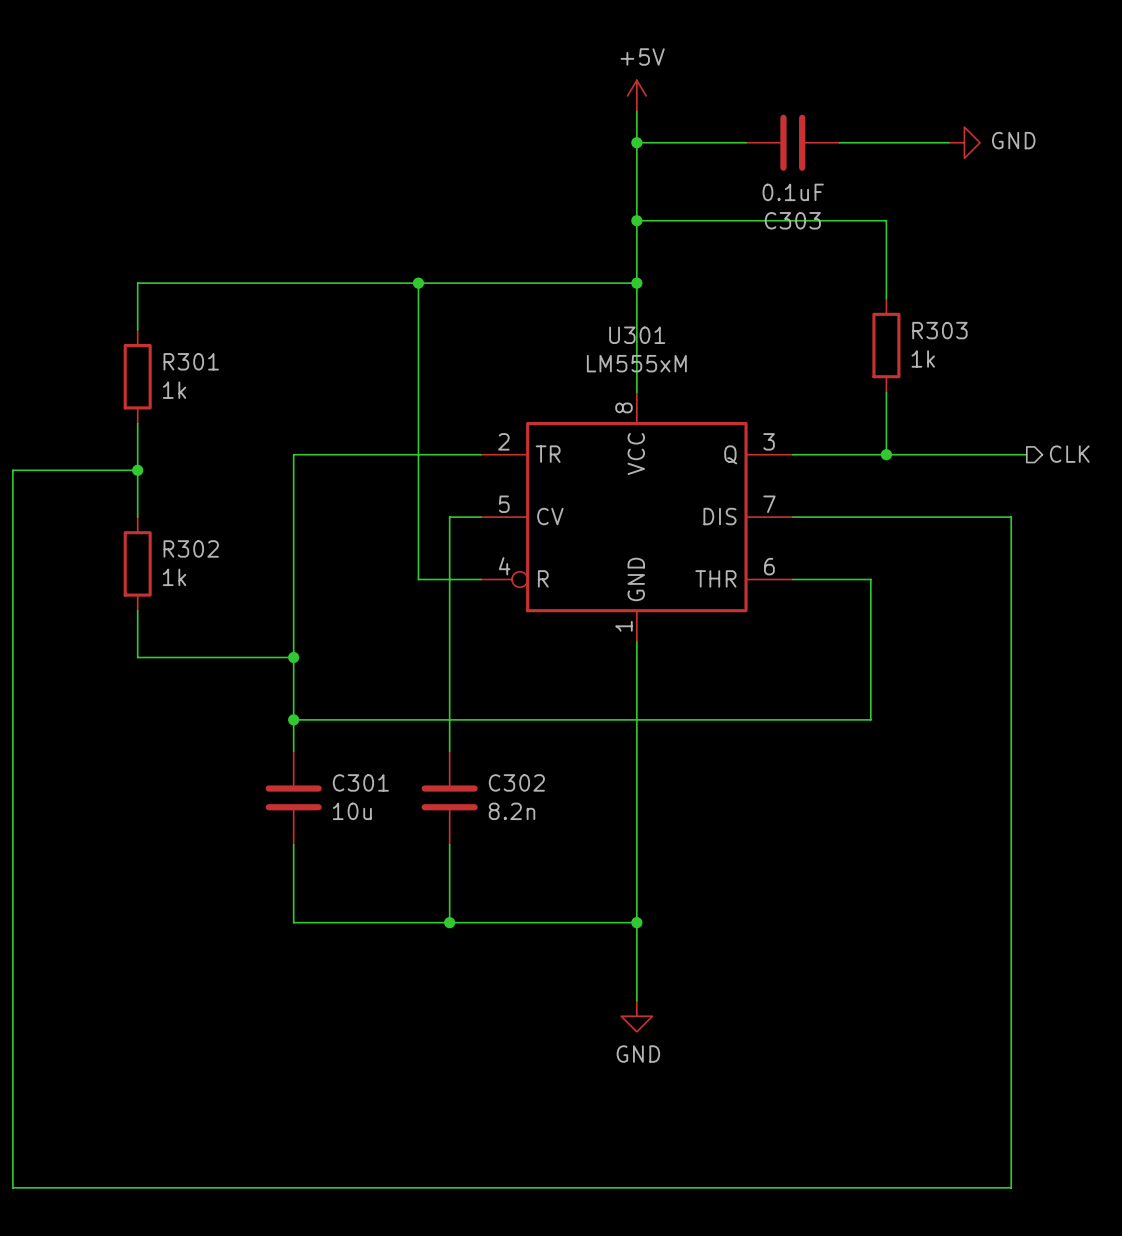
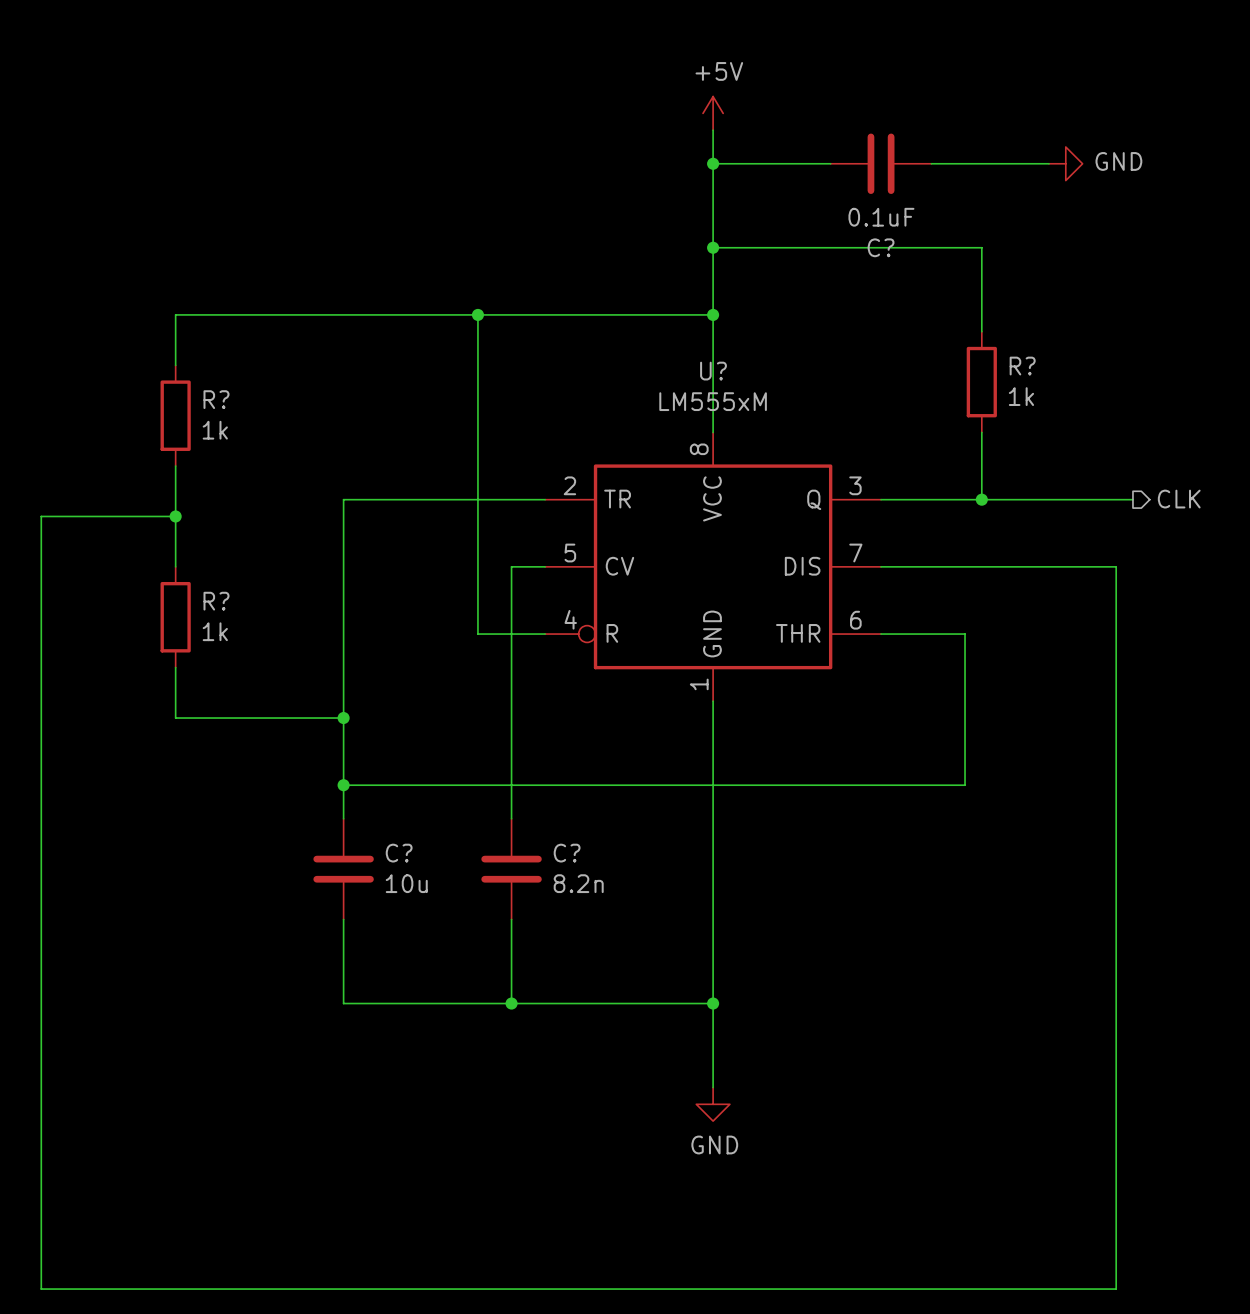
C303 name: C303 (792, 220) -> C? (881, 247)
R303 name: R303 (939, 330) -> R? (1022, 366)
U301 name: U301 (637, 335) -> U? (713, 371)
R301 name: R301 (191, 361) -> R? (216, 399)
R302 name: R302 (191, 548) -> R? (216, 601)
C301 name: C301 (360, 782) -> C? (399, 853)
C302 name: C302 (516, 782) -> C? (567, 853)

